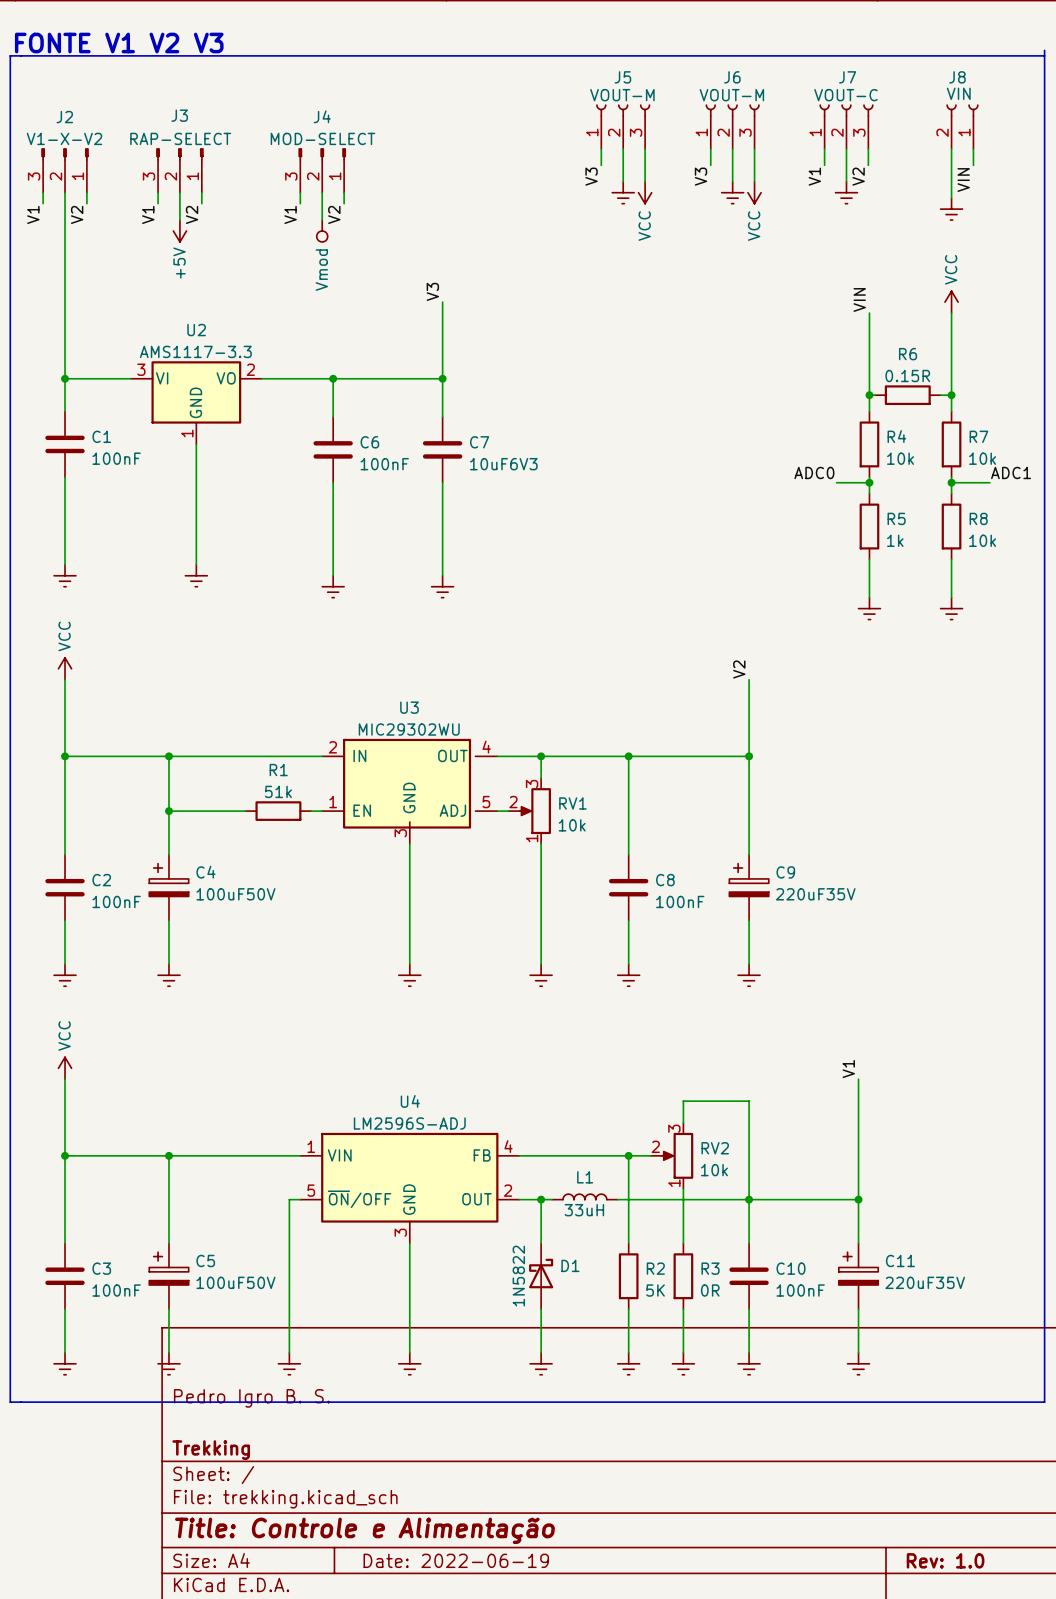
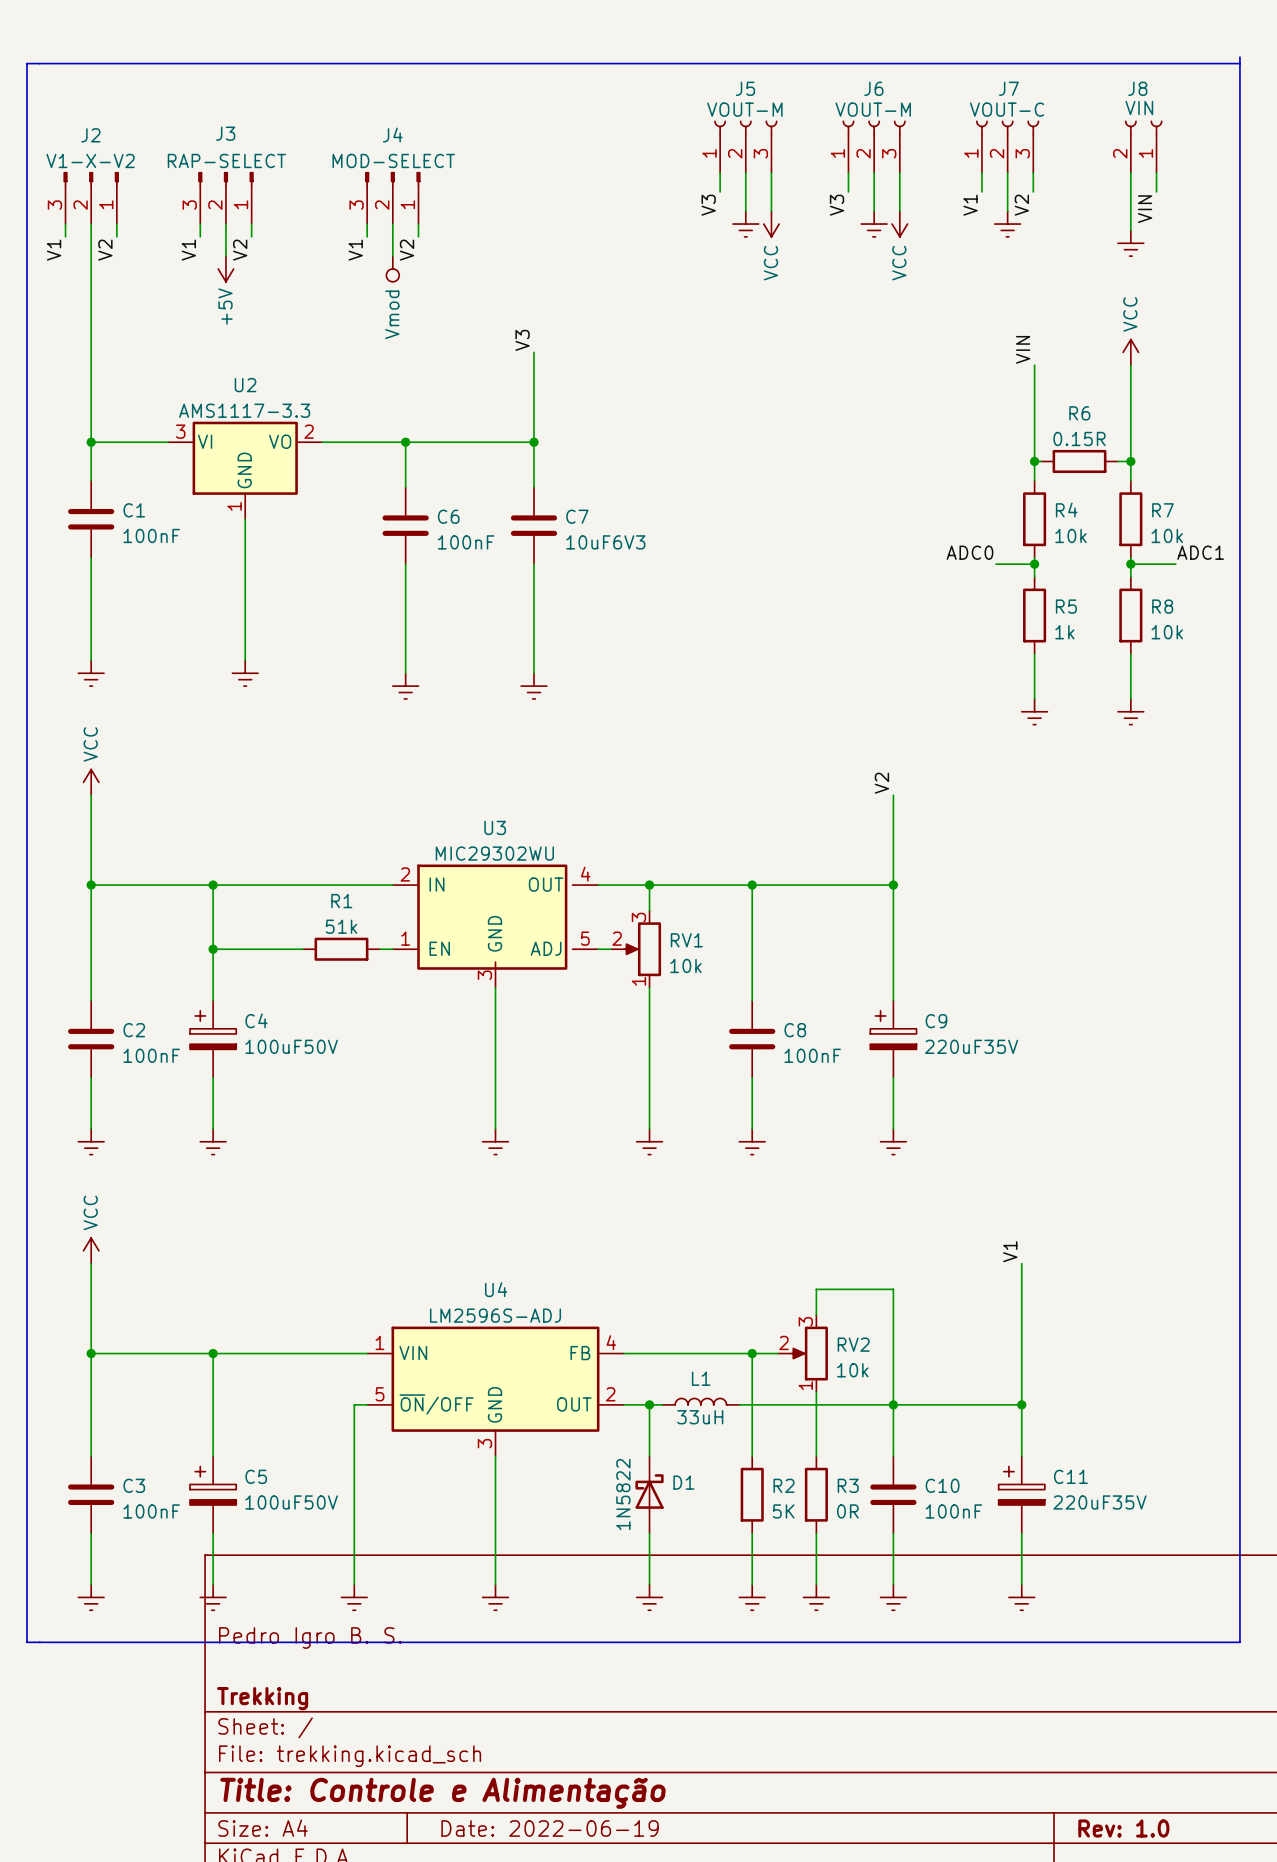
text: FONTE V1 V2 V3 (119, 43) -> none

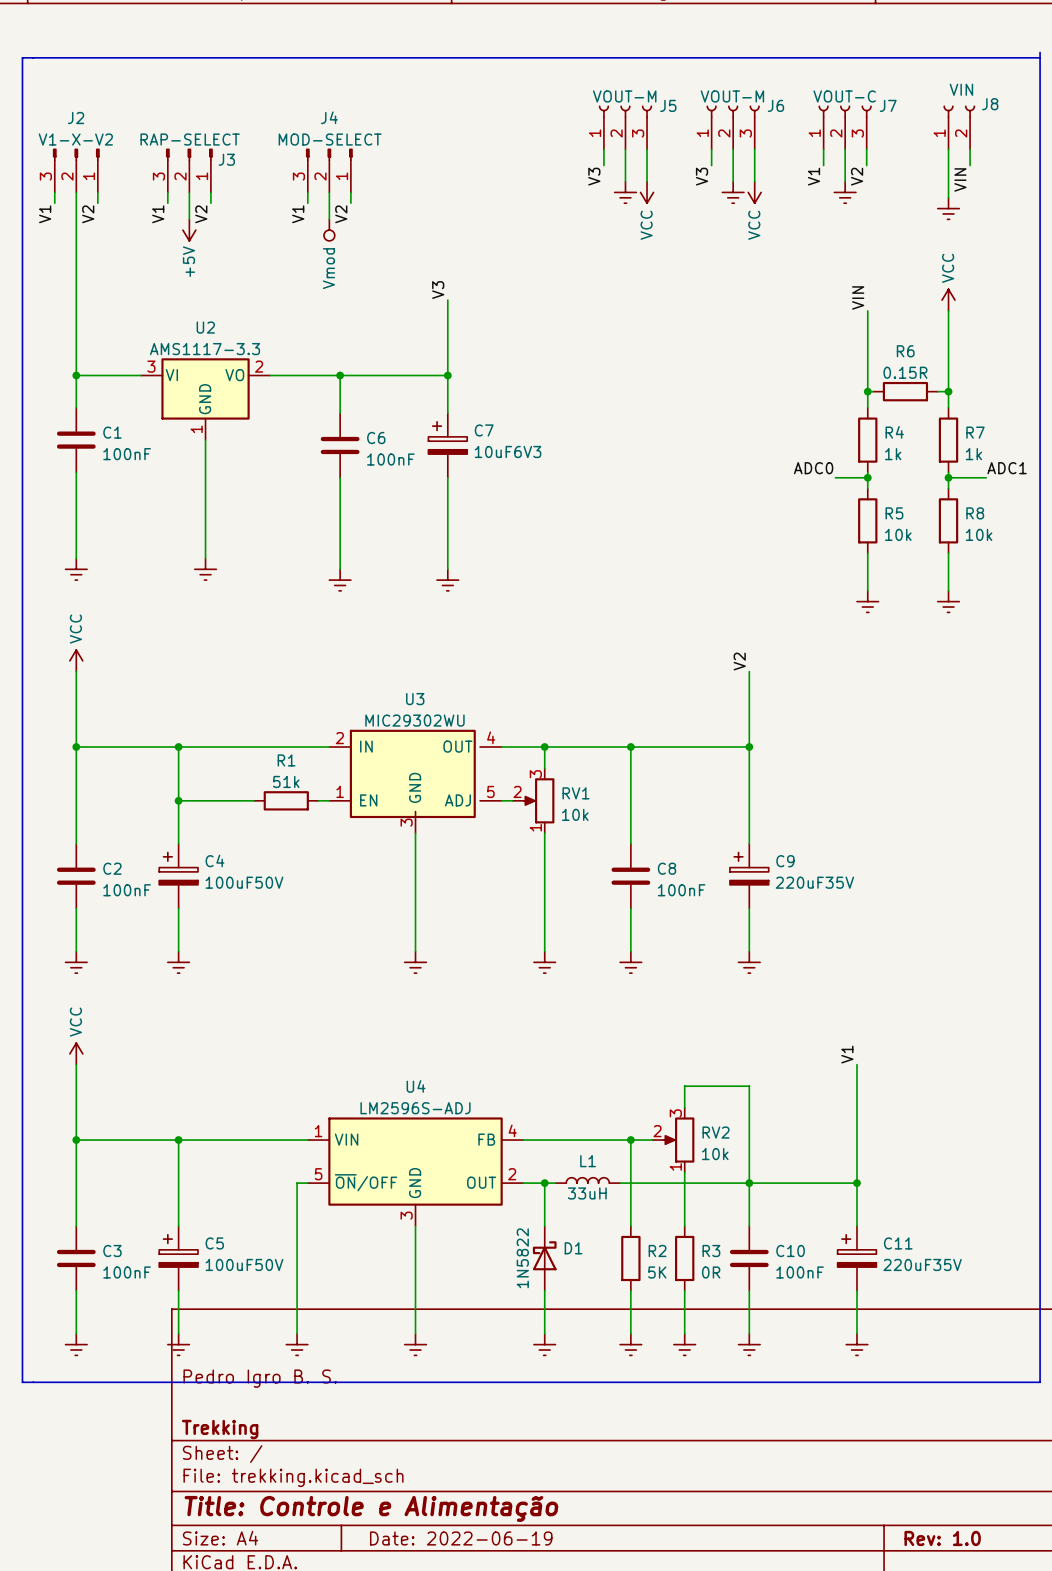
J5 name position: J5 (745, 88) -> J5 (668, 105)
J6 name position: J6 (873, 88) -> J6 (775, 105)
J7 name position: J7 (1008, 88) -> J7 (888, 105)
J8 name position: J8 (1137, 88) -> J8 (990, 104)
J8 flip: as is (1143, 127) -> left-right (959, 111)
J3 name position: J3 (225, 133) -> J3 (226, 159)
C7 symbol: [510, 487, 558, 565] -> [428, 413, 468, 478]
R4 value: 10k (1070, 535) -> 1k (893, 454)
R7 value: 10k (1167, 535) -> 1k (973, 454)
R5 value: 1k (1064, 632) -> 10k (898, 534)

